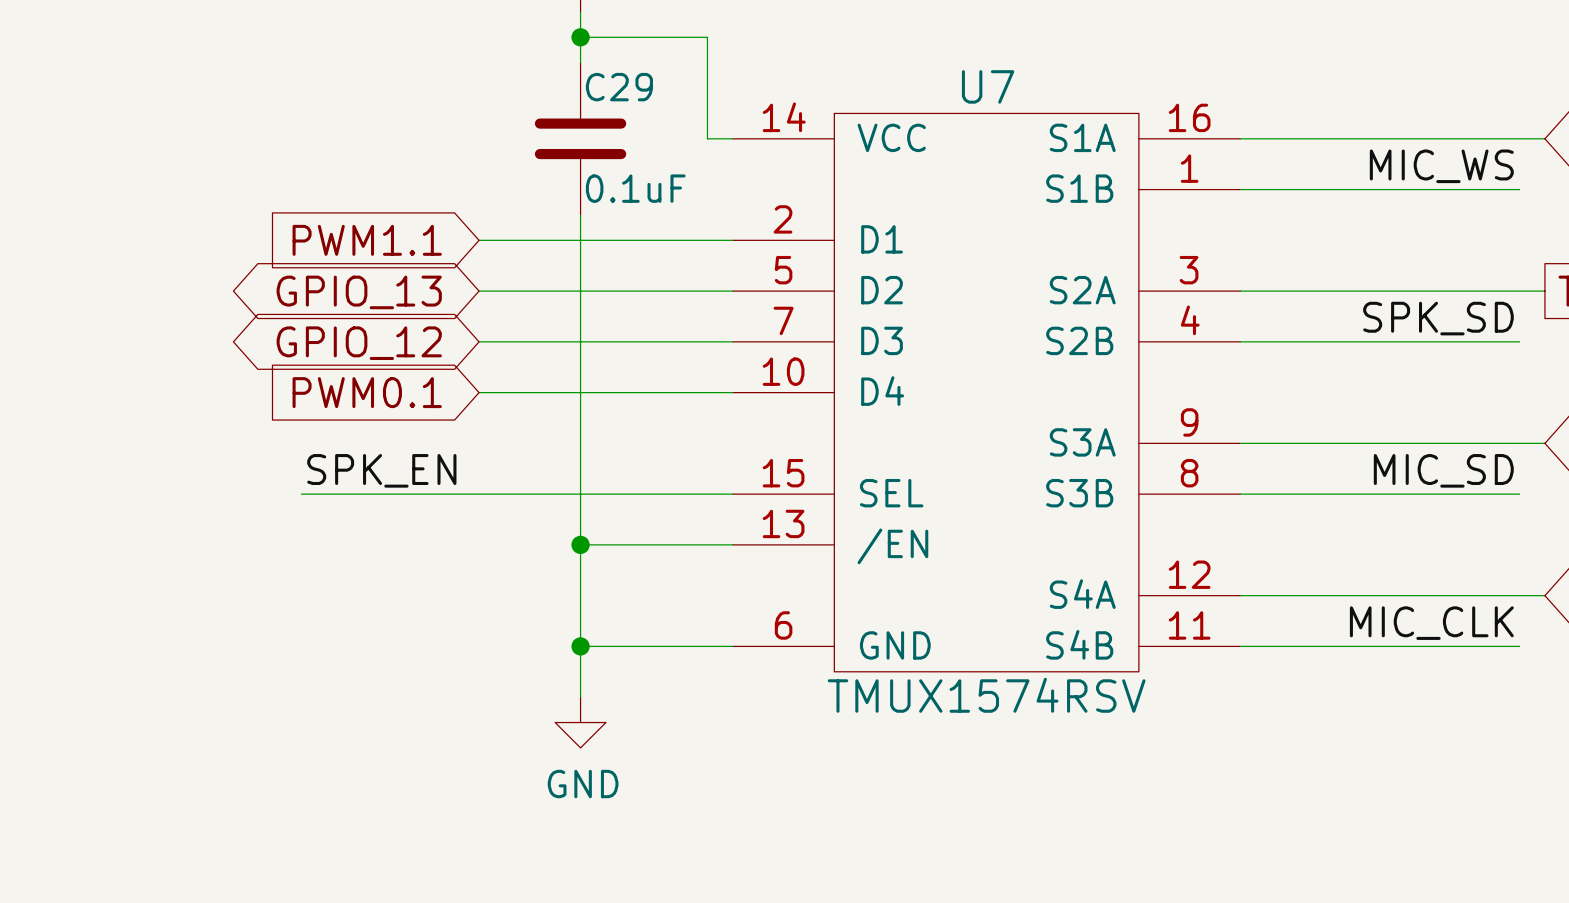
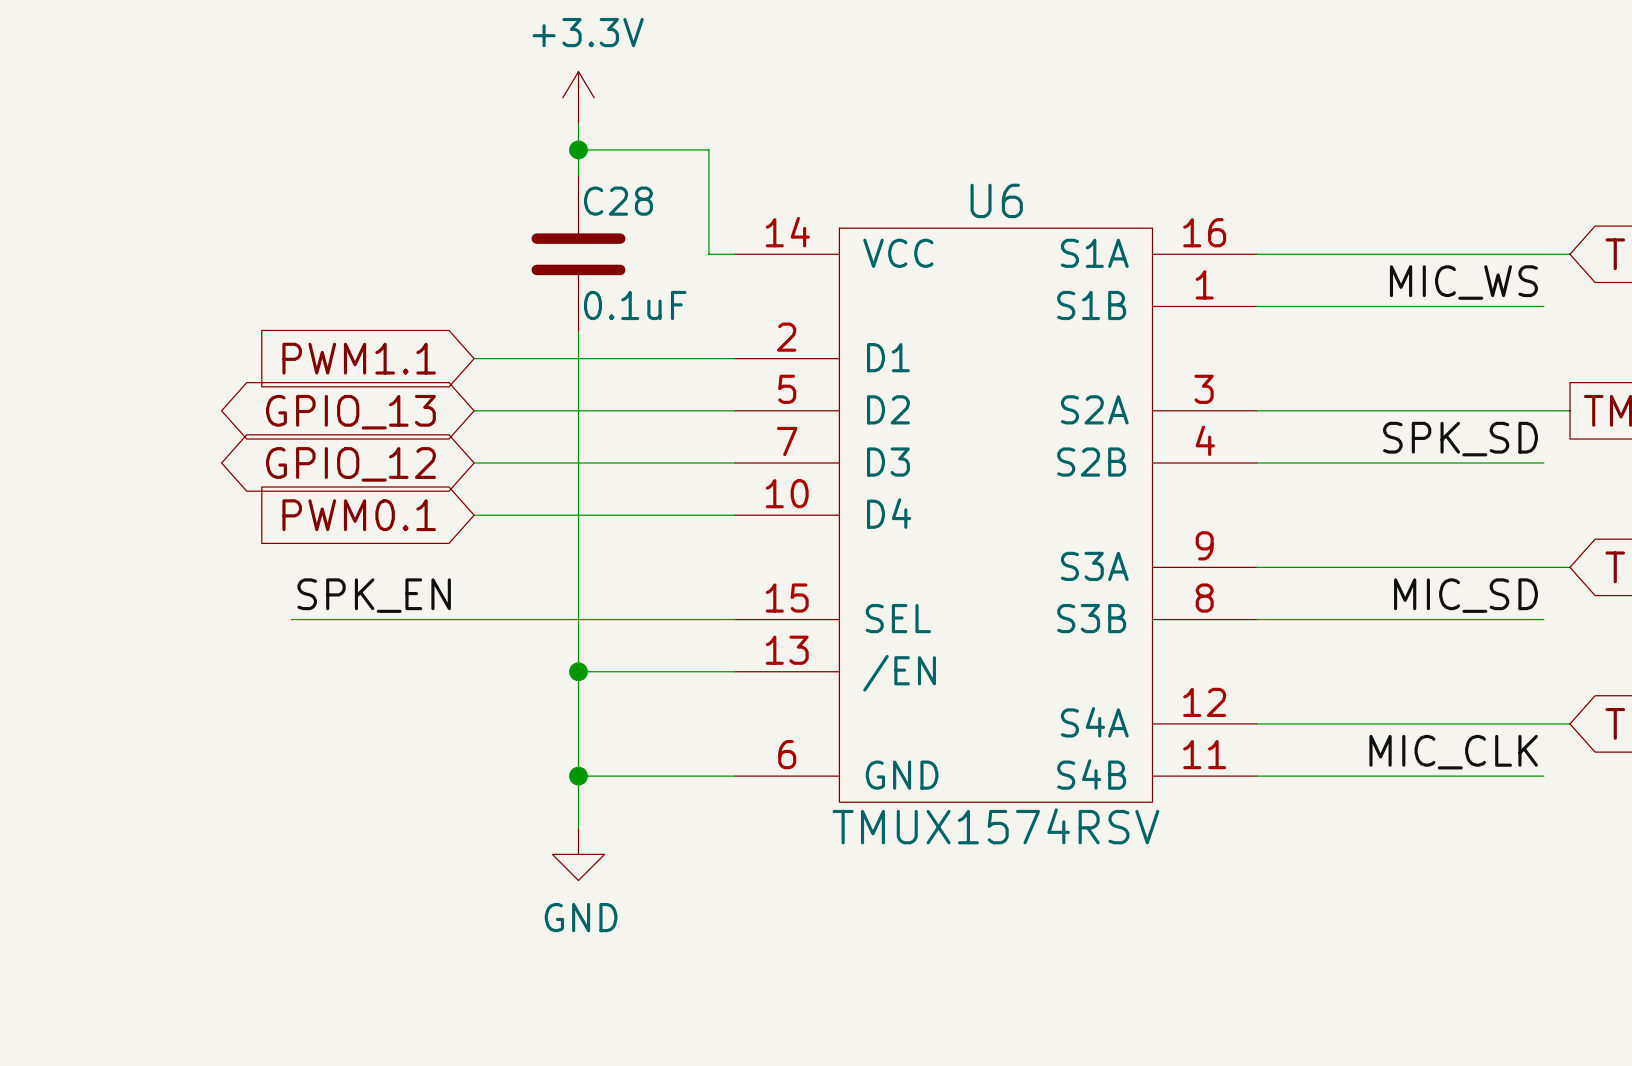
U7 name: U7 (988, 86) -> U6 (996, 200)
C29 name: C29 (619, 87) -> C28 (618, 201)

